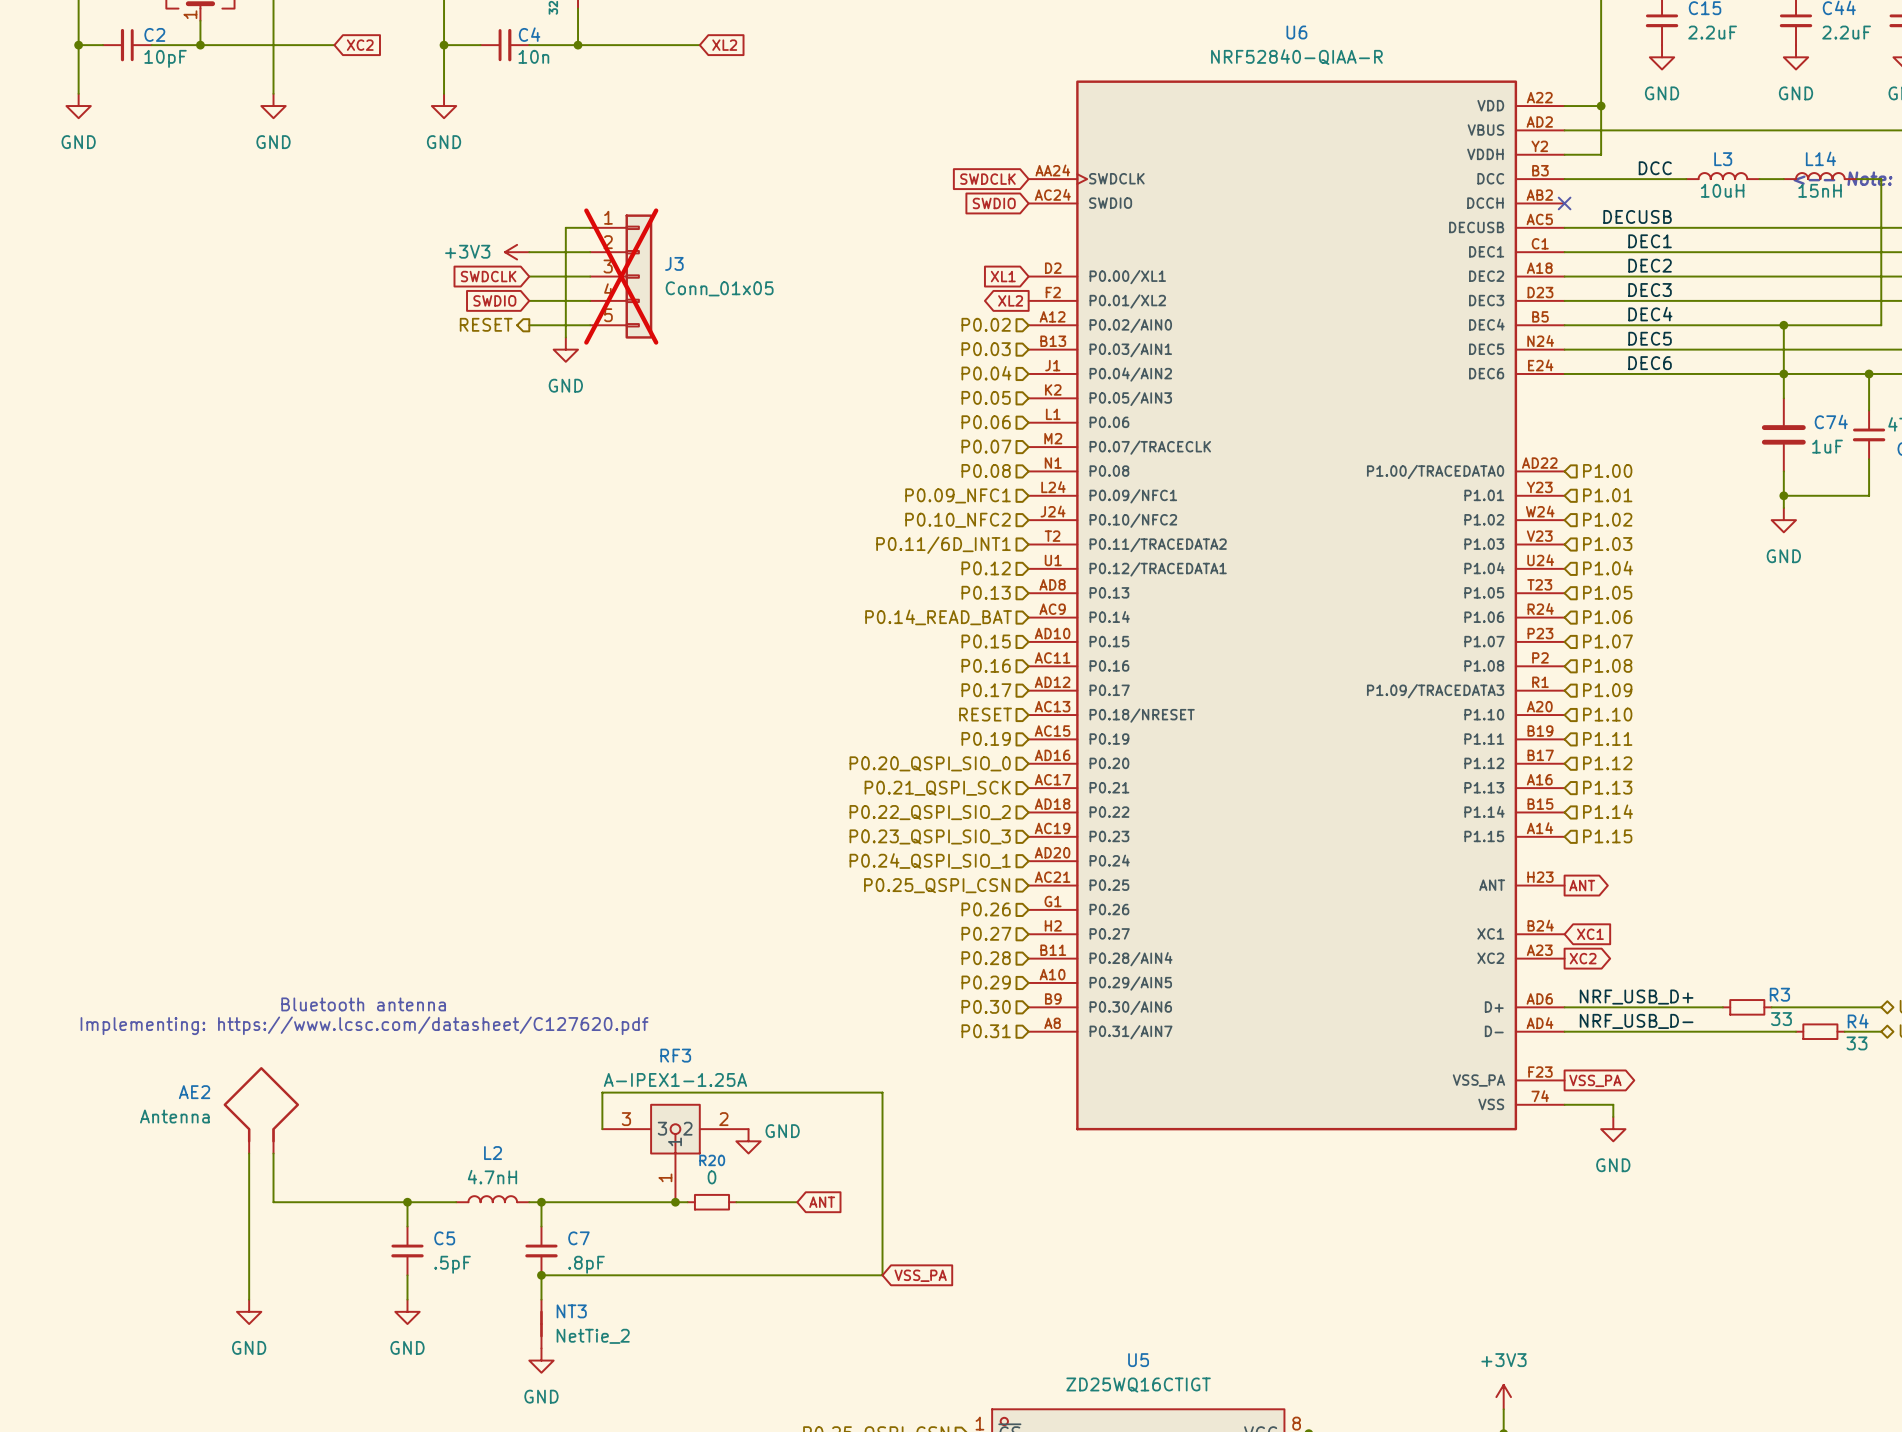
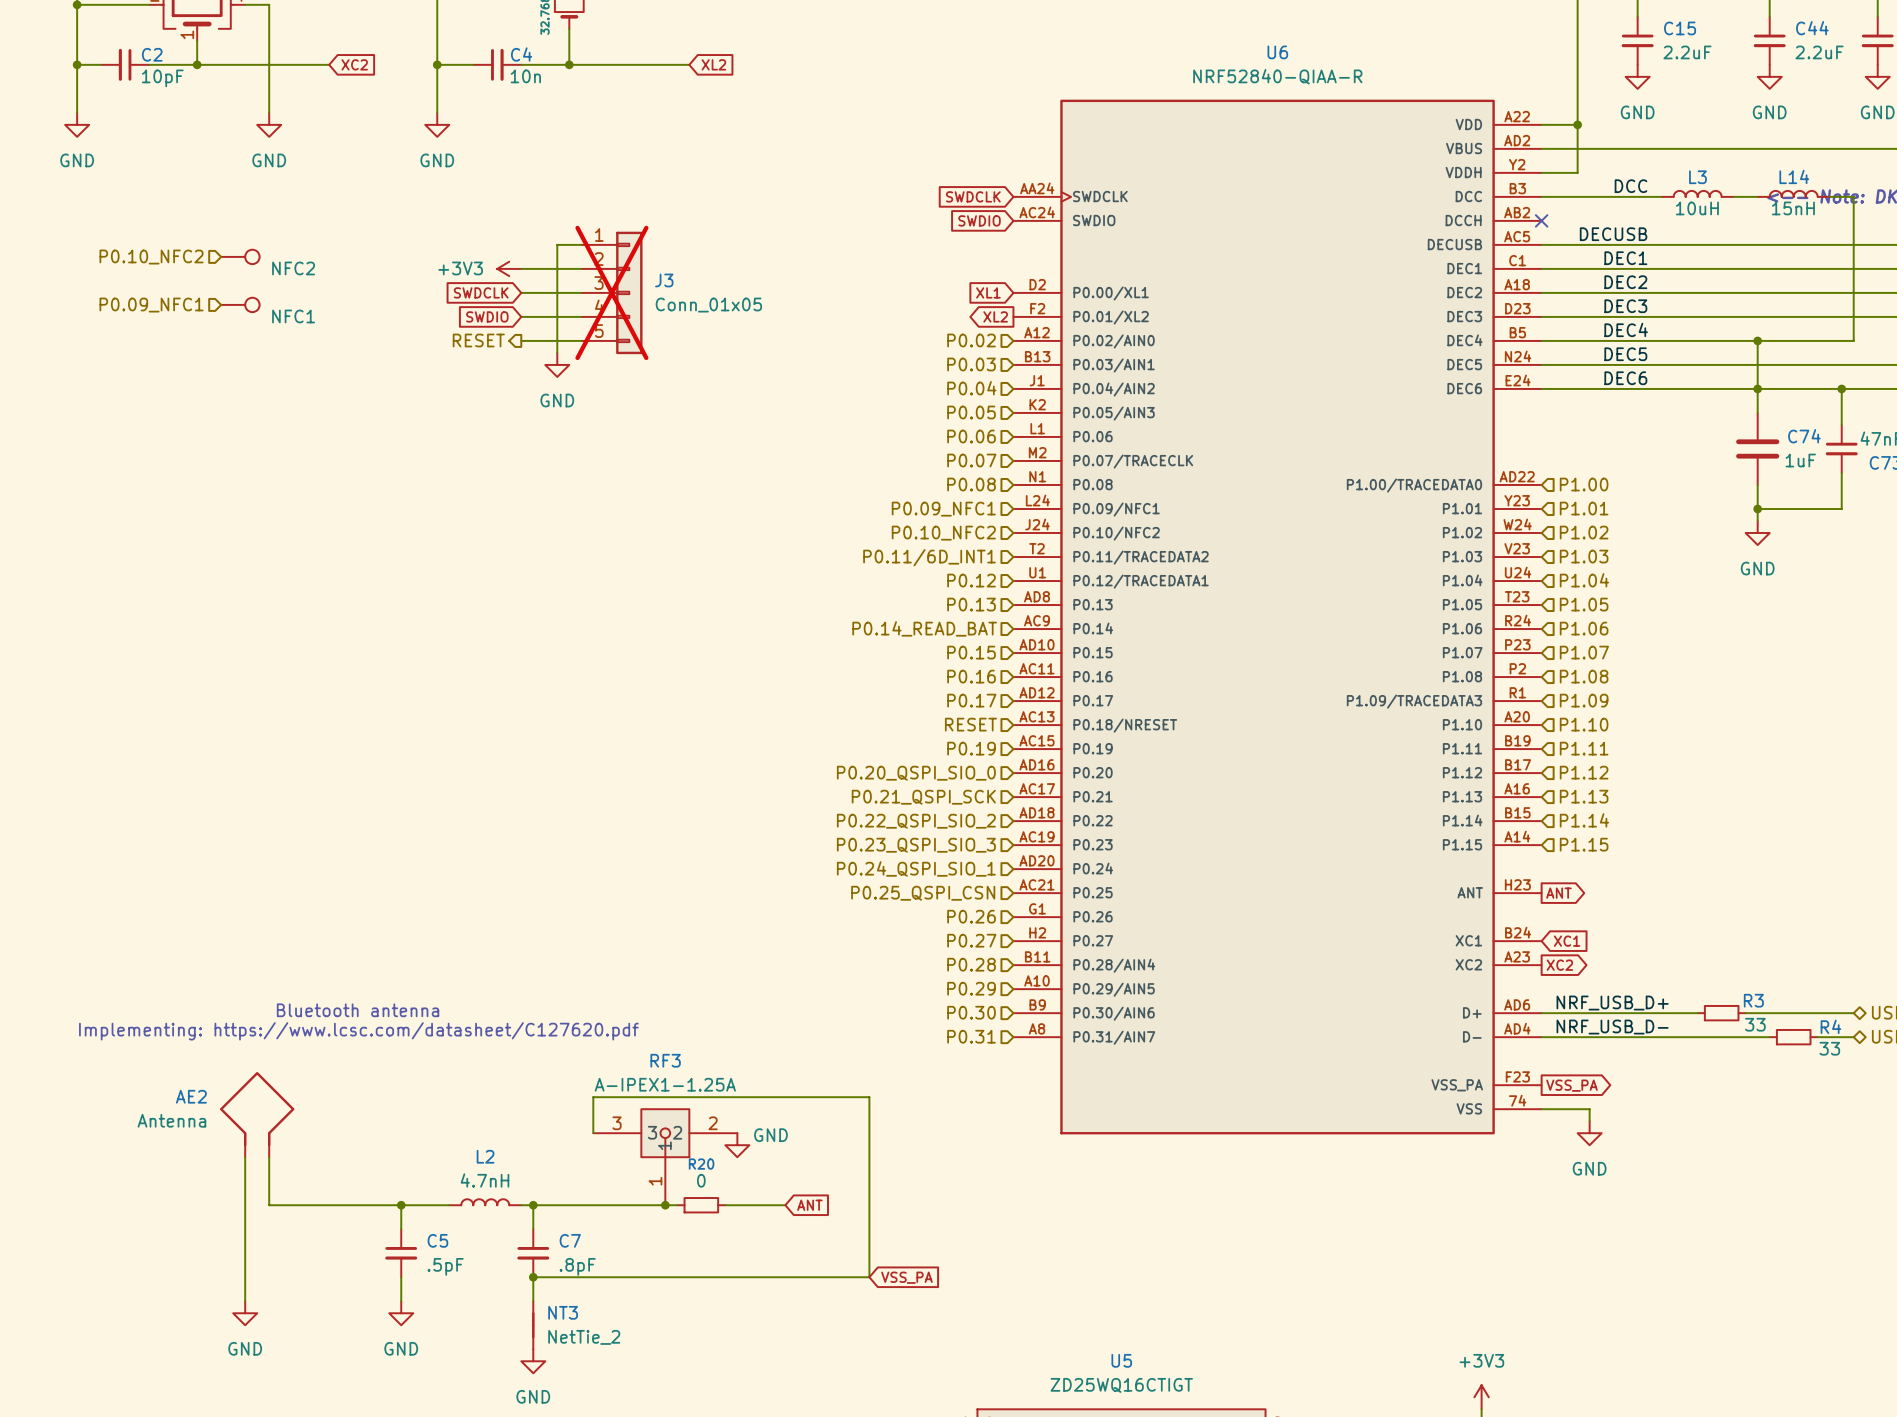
hierarchical label: none -> P0.10_NFC2 (151, 257)
part: none -> NFC2 (240, 256)
hierarchical label: none -> P0.09_NFC1 (151, 305)
part: none -> NFC1 (240, 304)

